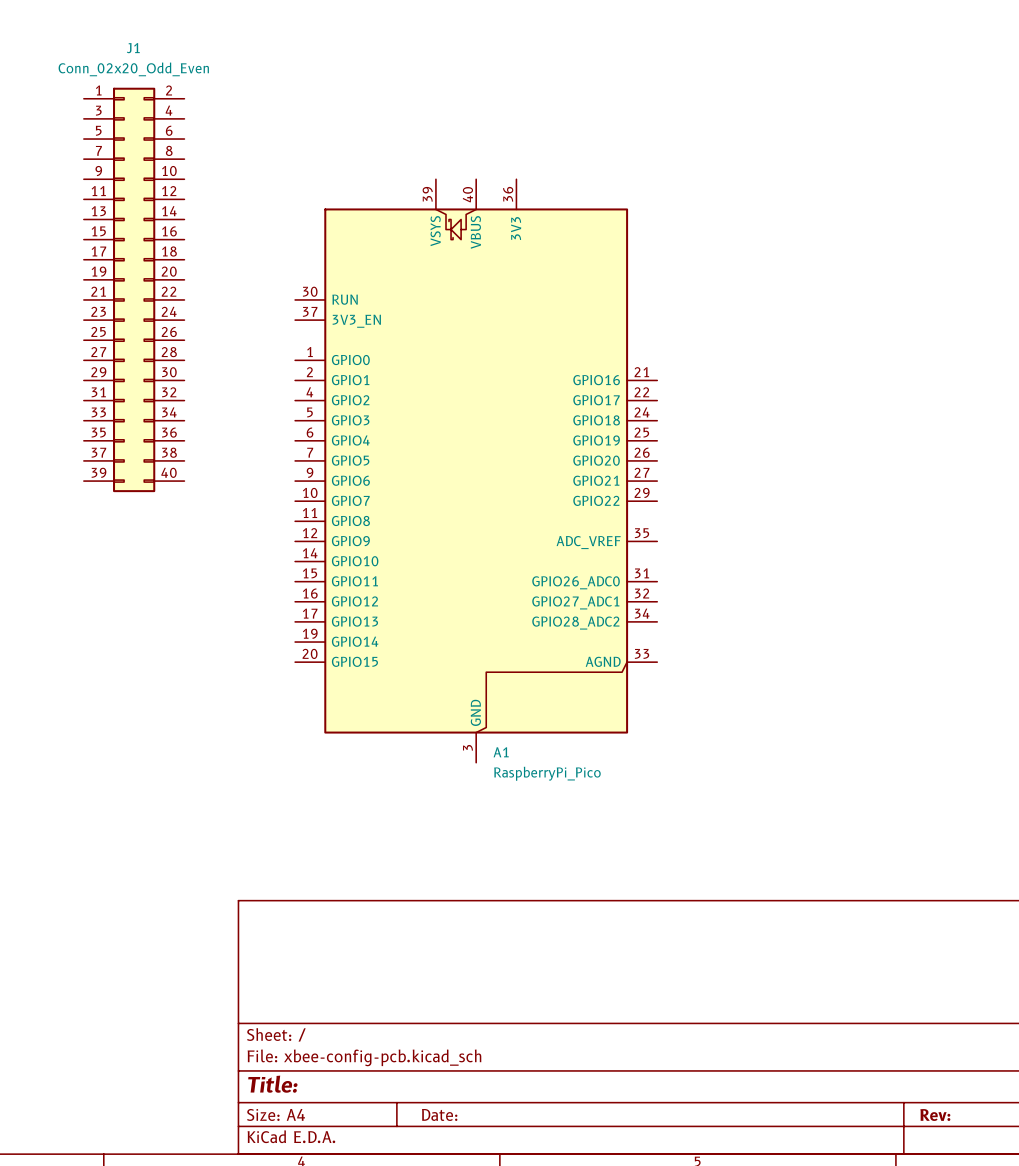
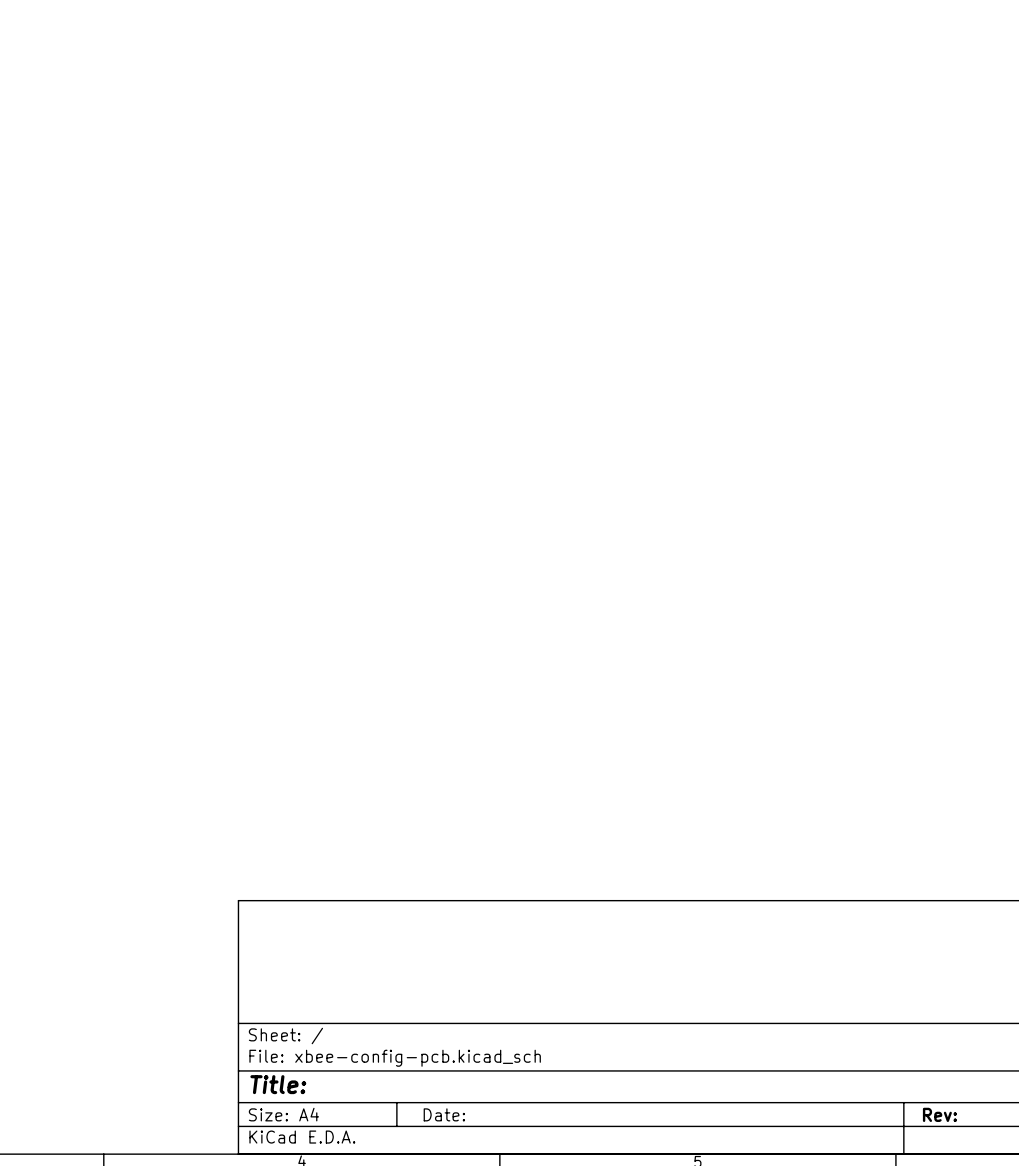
J1: Conn_02x20_Odd_Even (134, 289) -> none
A1: RaspberryPi_Pico (476, 471) -> none

